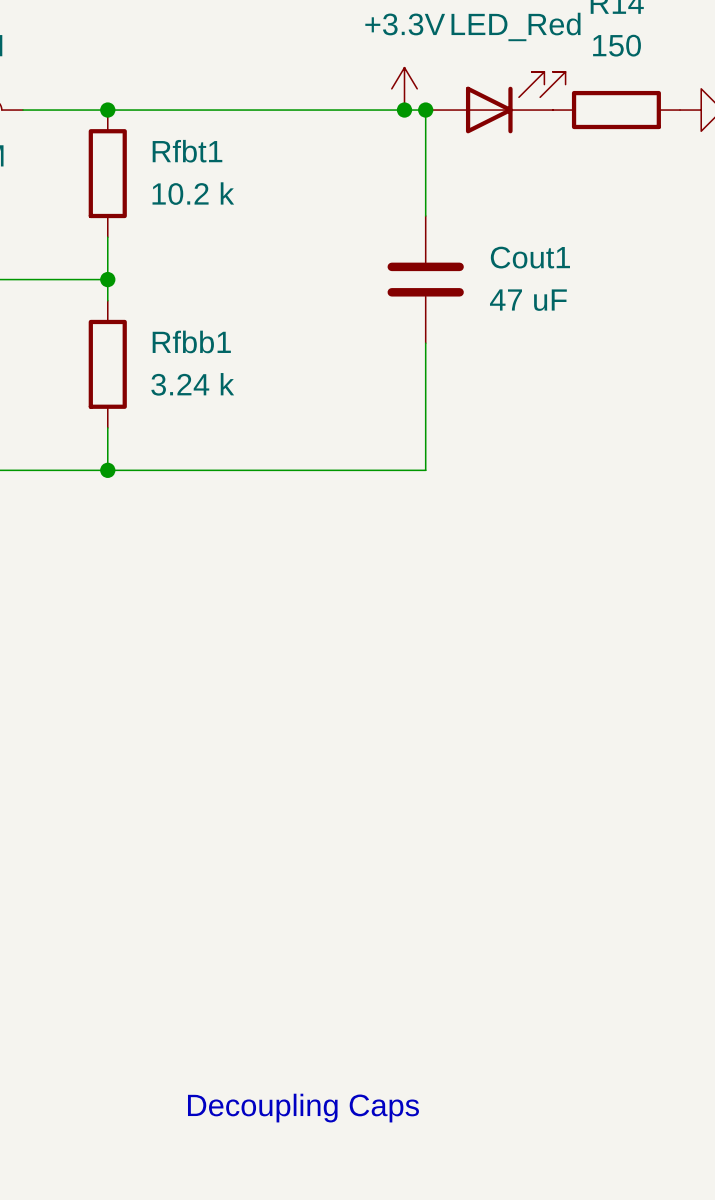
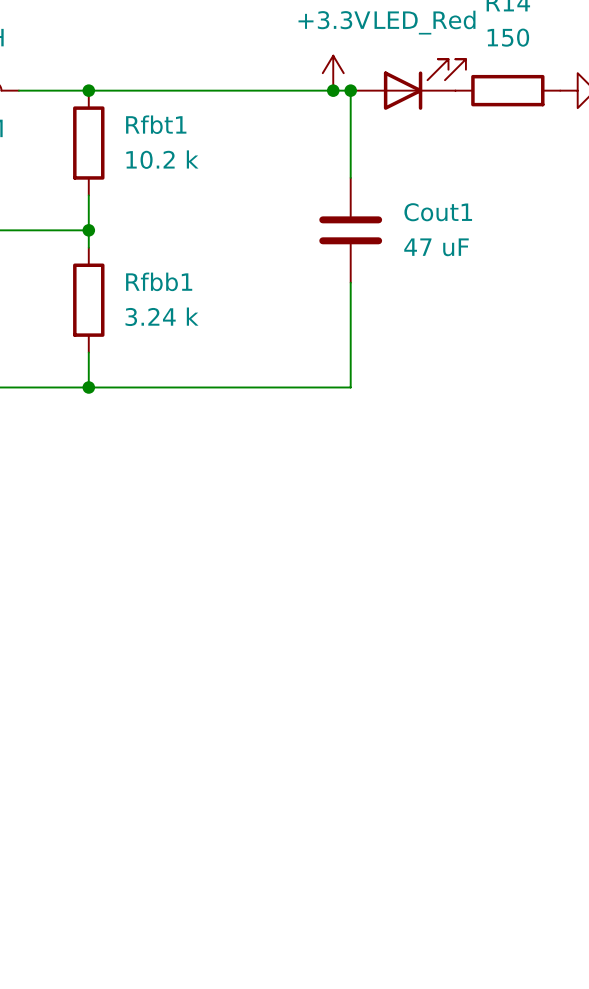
text: Decoupling Caps (303, 1108) -> none

